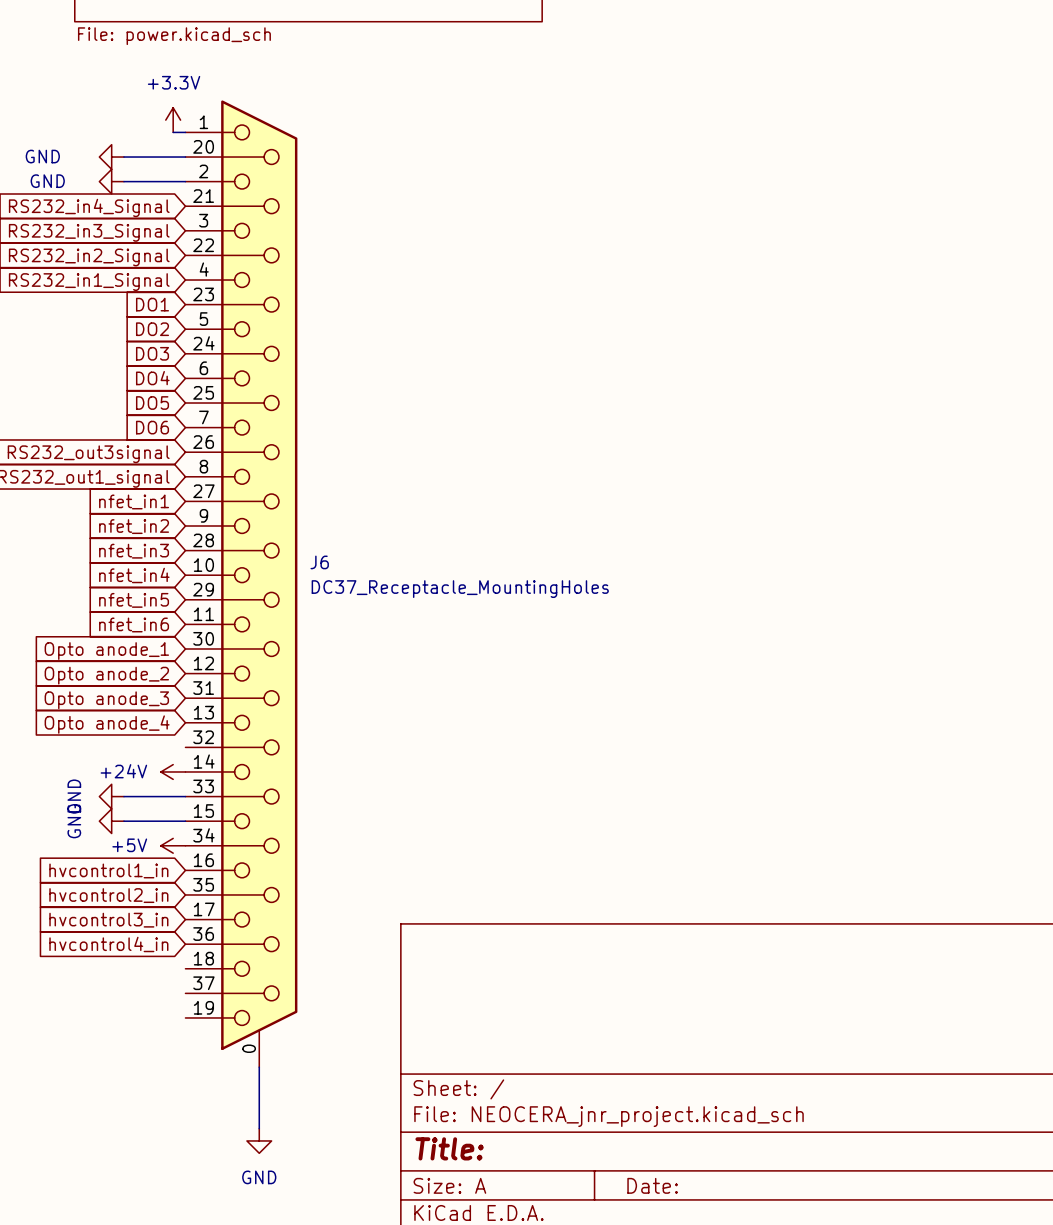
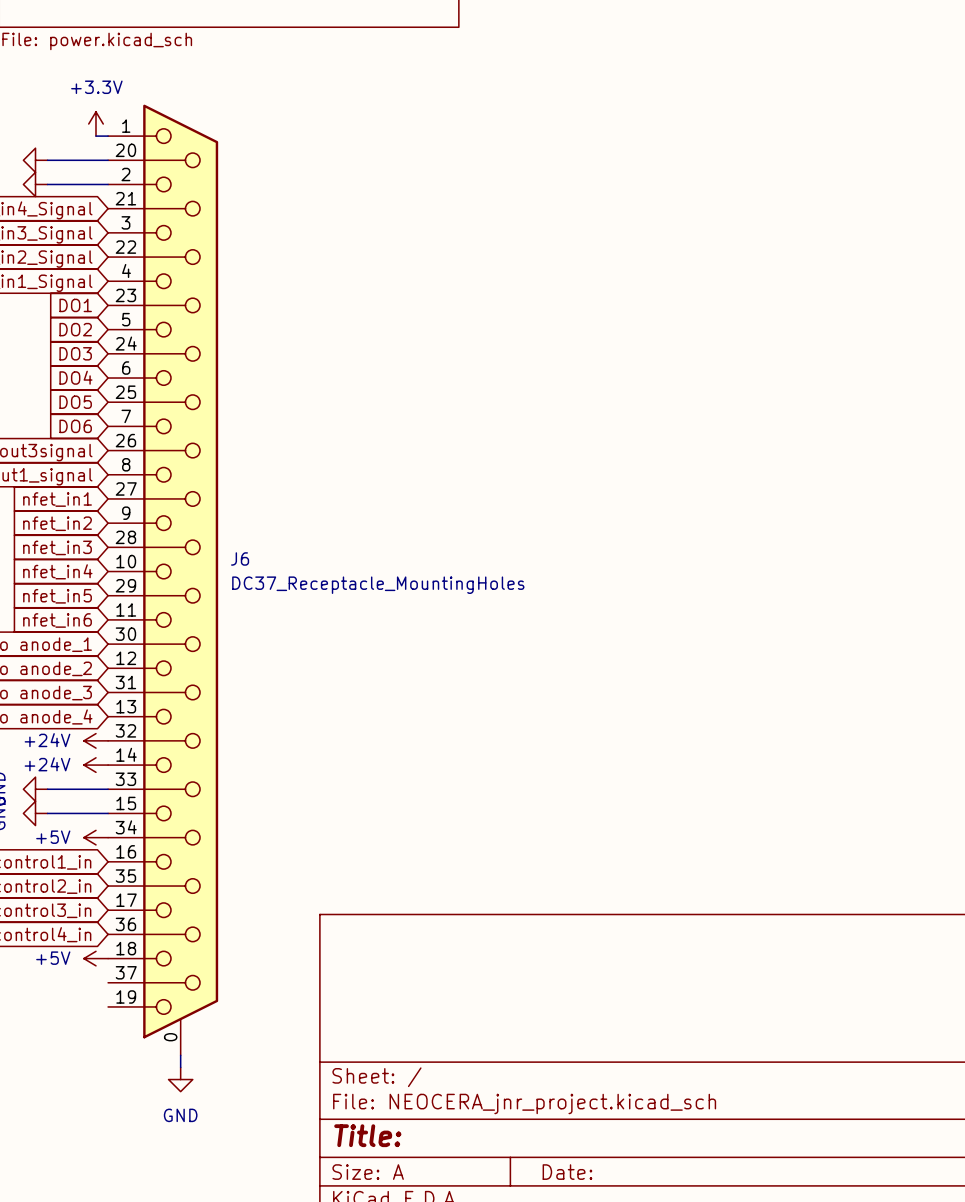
power symbol: none -> +24V (95, 740)
power symbol: none -> +5V (95, 958)
wire: (259, 1079) (259, 1128) -> none
power symbol position: GND (259, 1140) -> GND (180, 1079)

